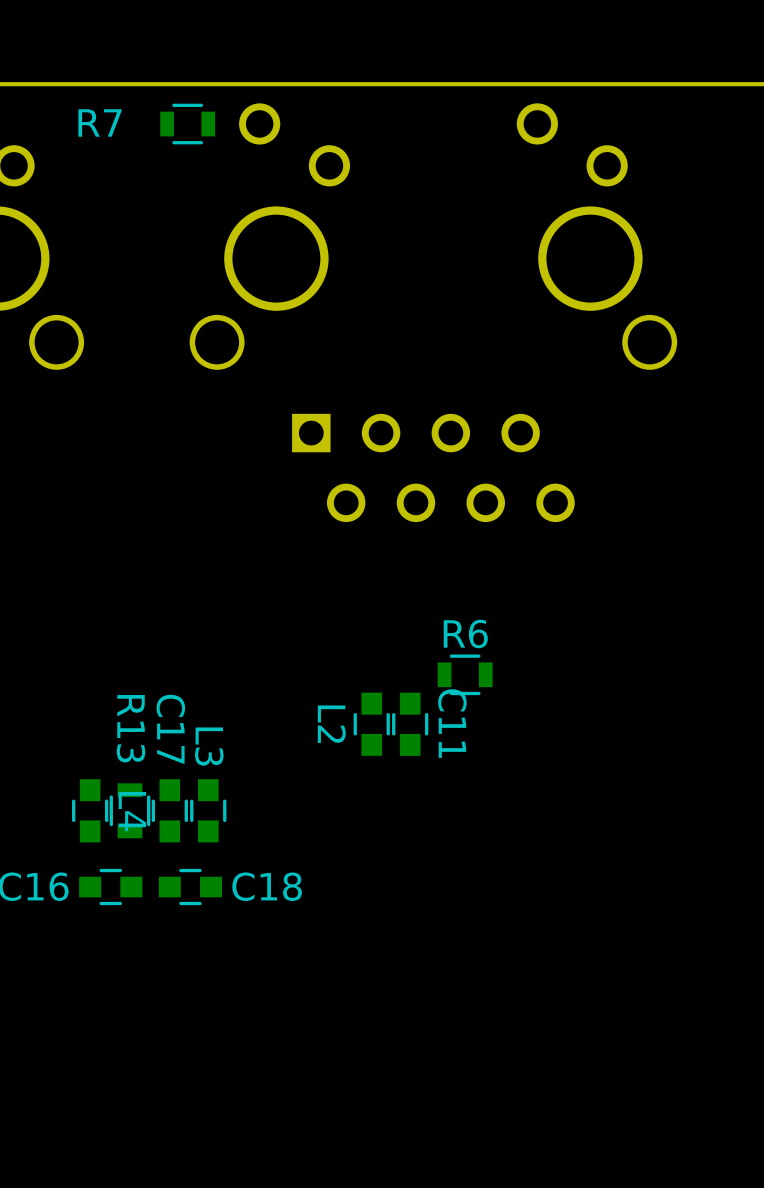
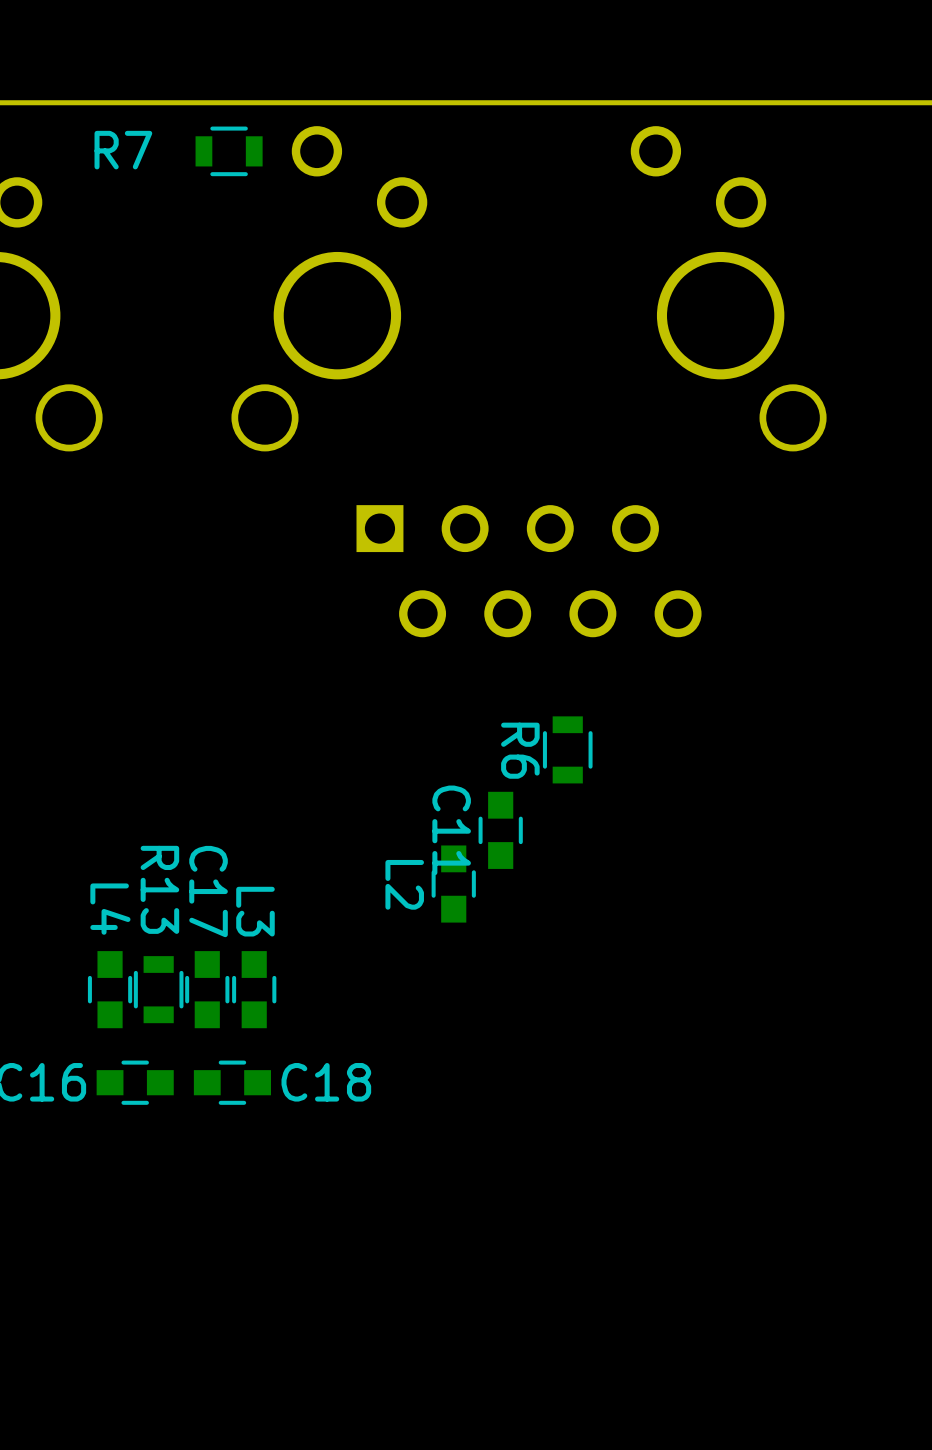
R6 name position: R6 (465, 633) -> R6 (520, 750)
R6 rotation: 0° (465, 674) -> 90° clockwise (567, 749)
R6 position: (465, 674) -> (567, 749)
C11 name position: C11 (452, 723) -> C11 (451, 830)
C11 position: (410, 724) -> (500, 830)
L4 name position: L4 (132, 811) -> L4 (110, 909)

